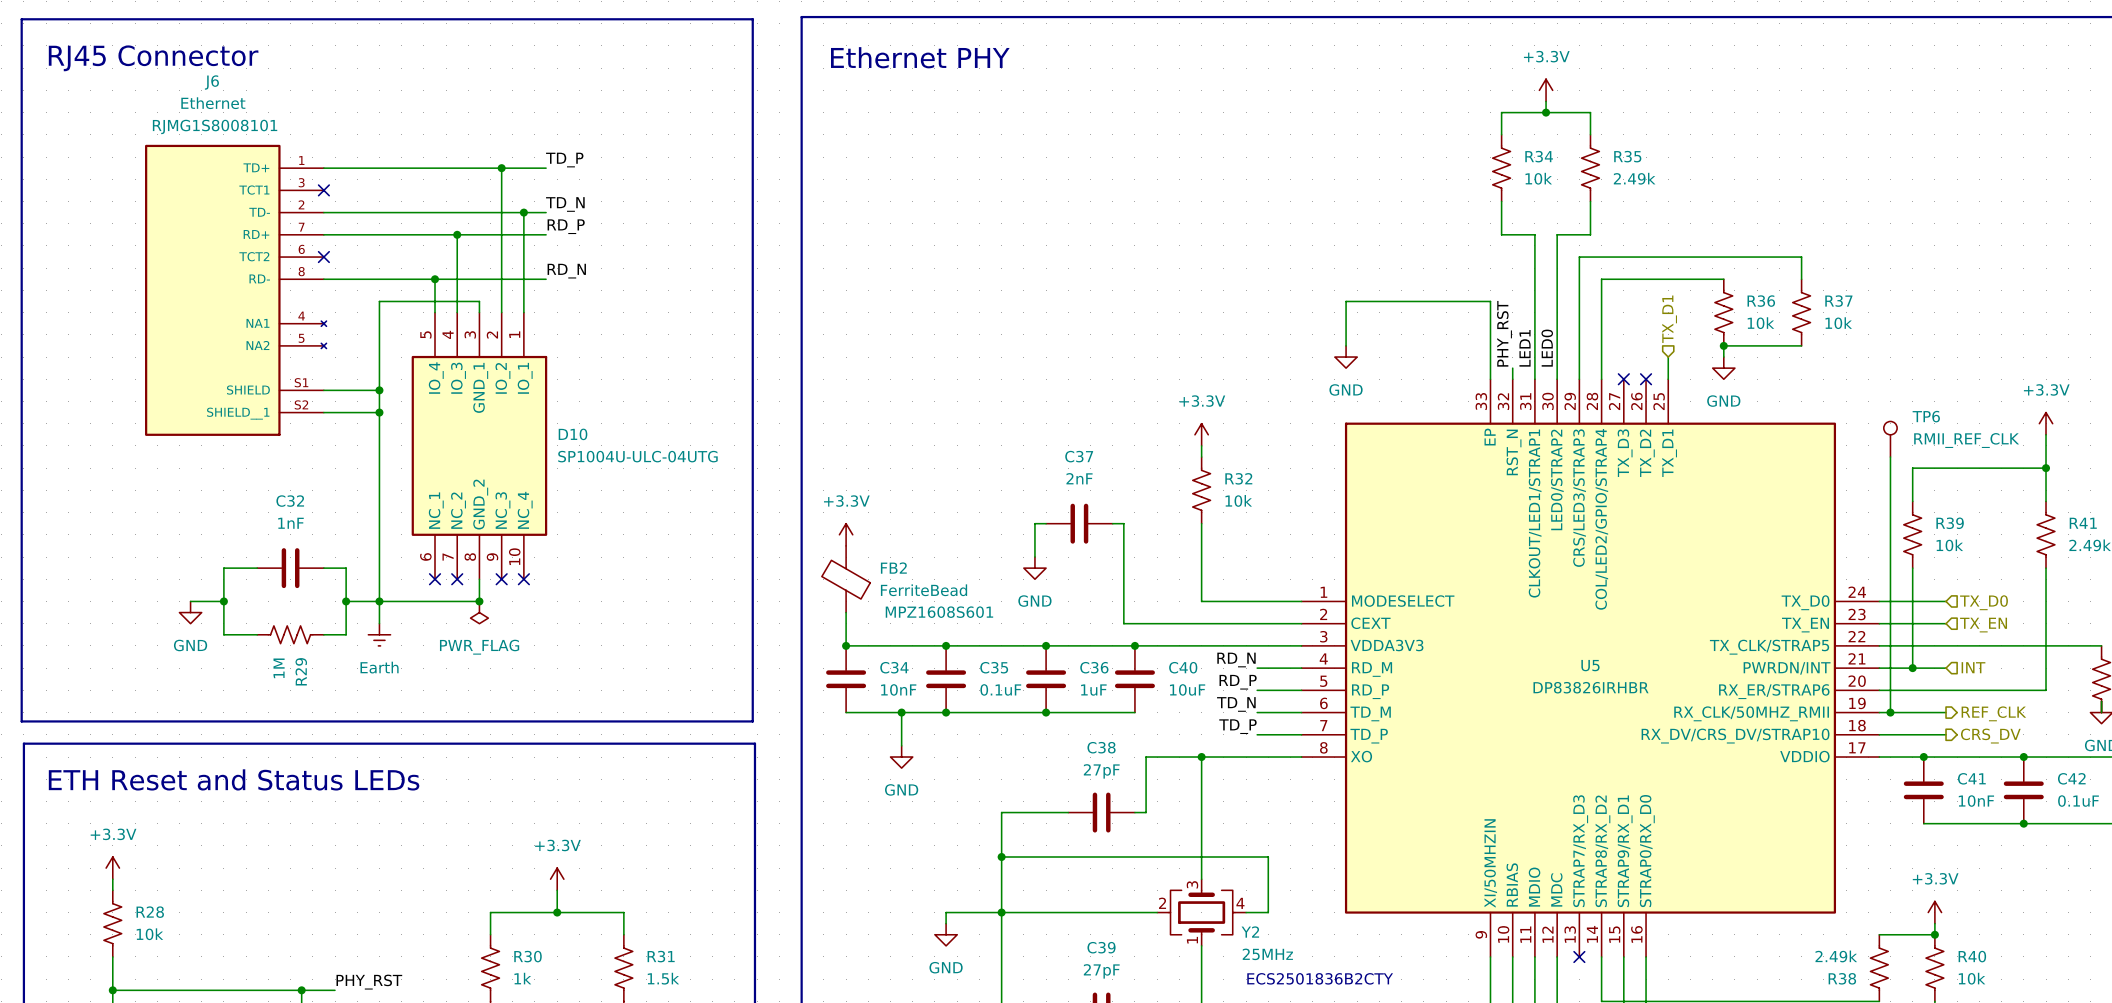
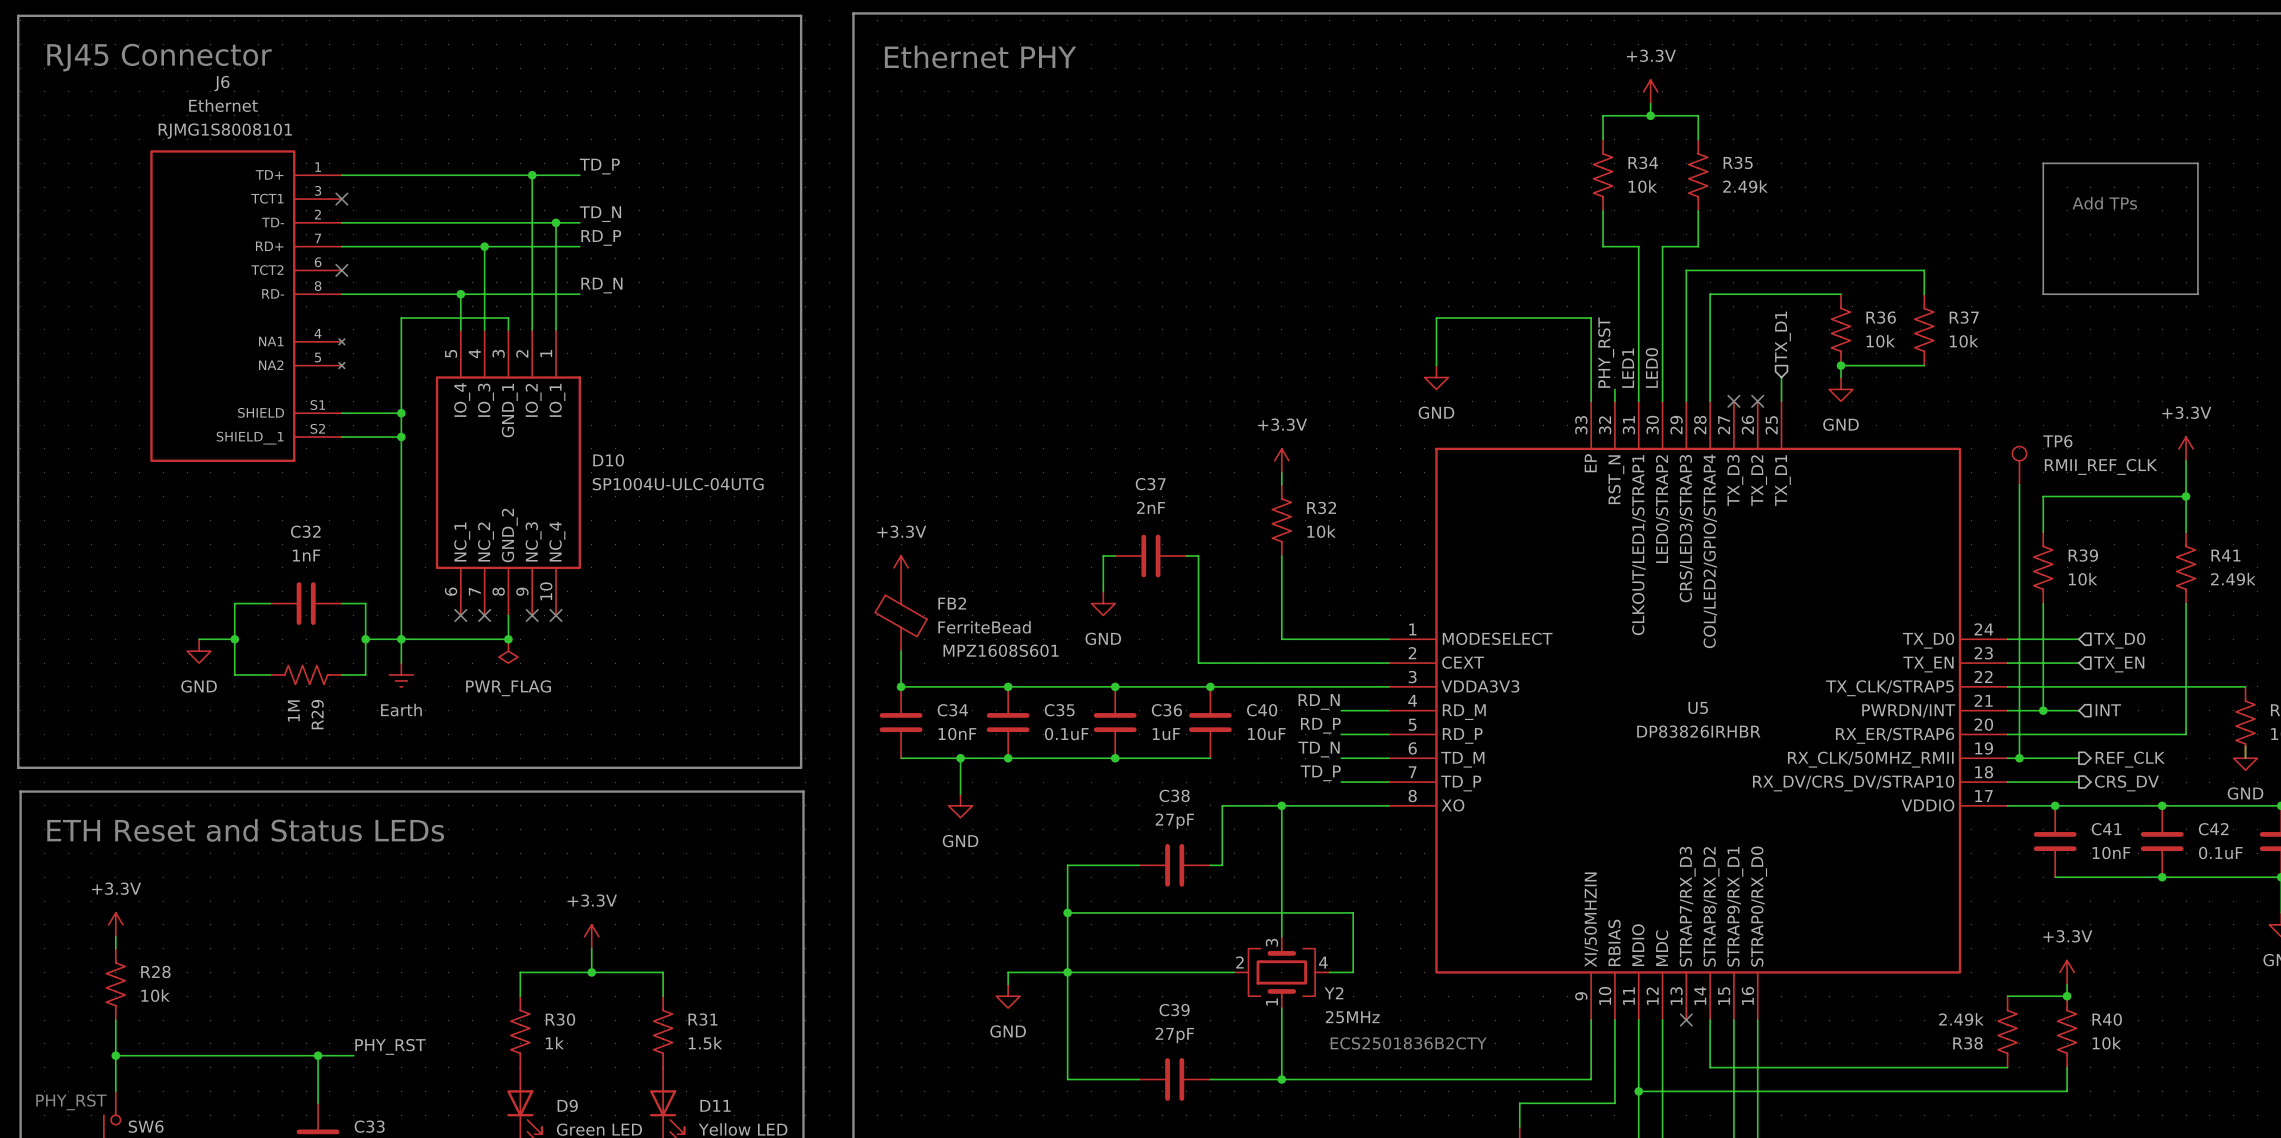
line: none -> (2043, 163) (2197, 163) (2197, 294) (2043, 294) (2043, 163)
text: none -> Add TPs (2104, 203)

